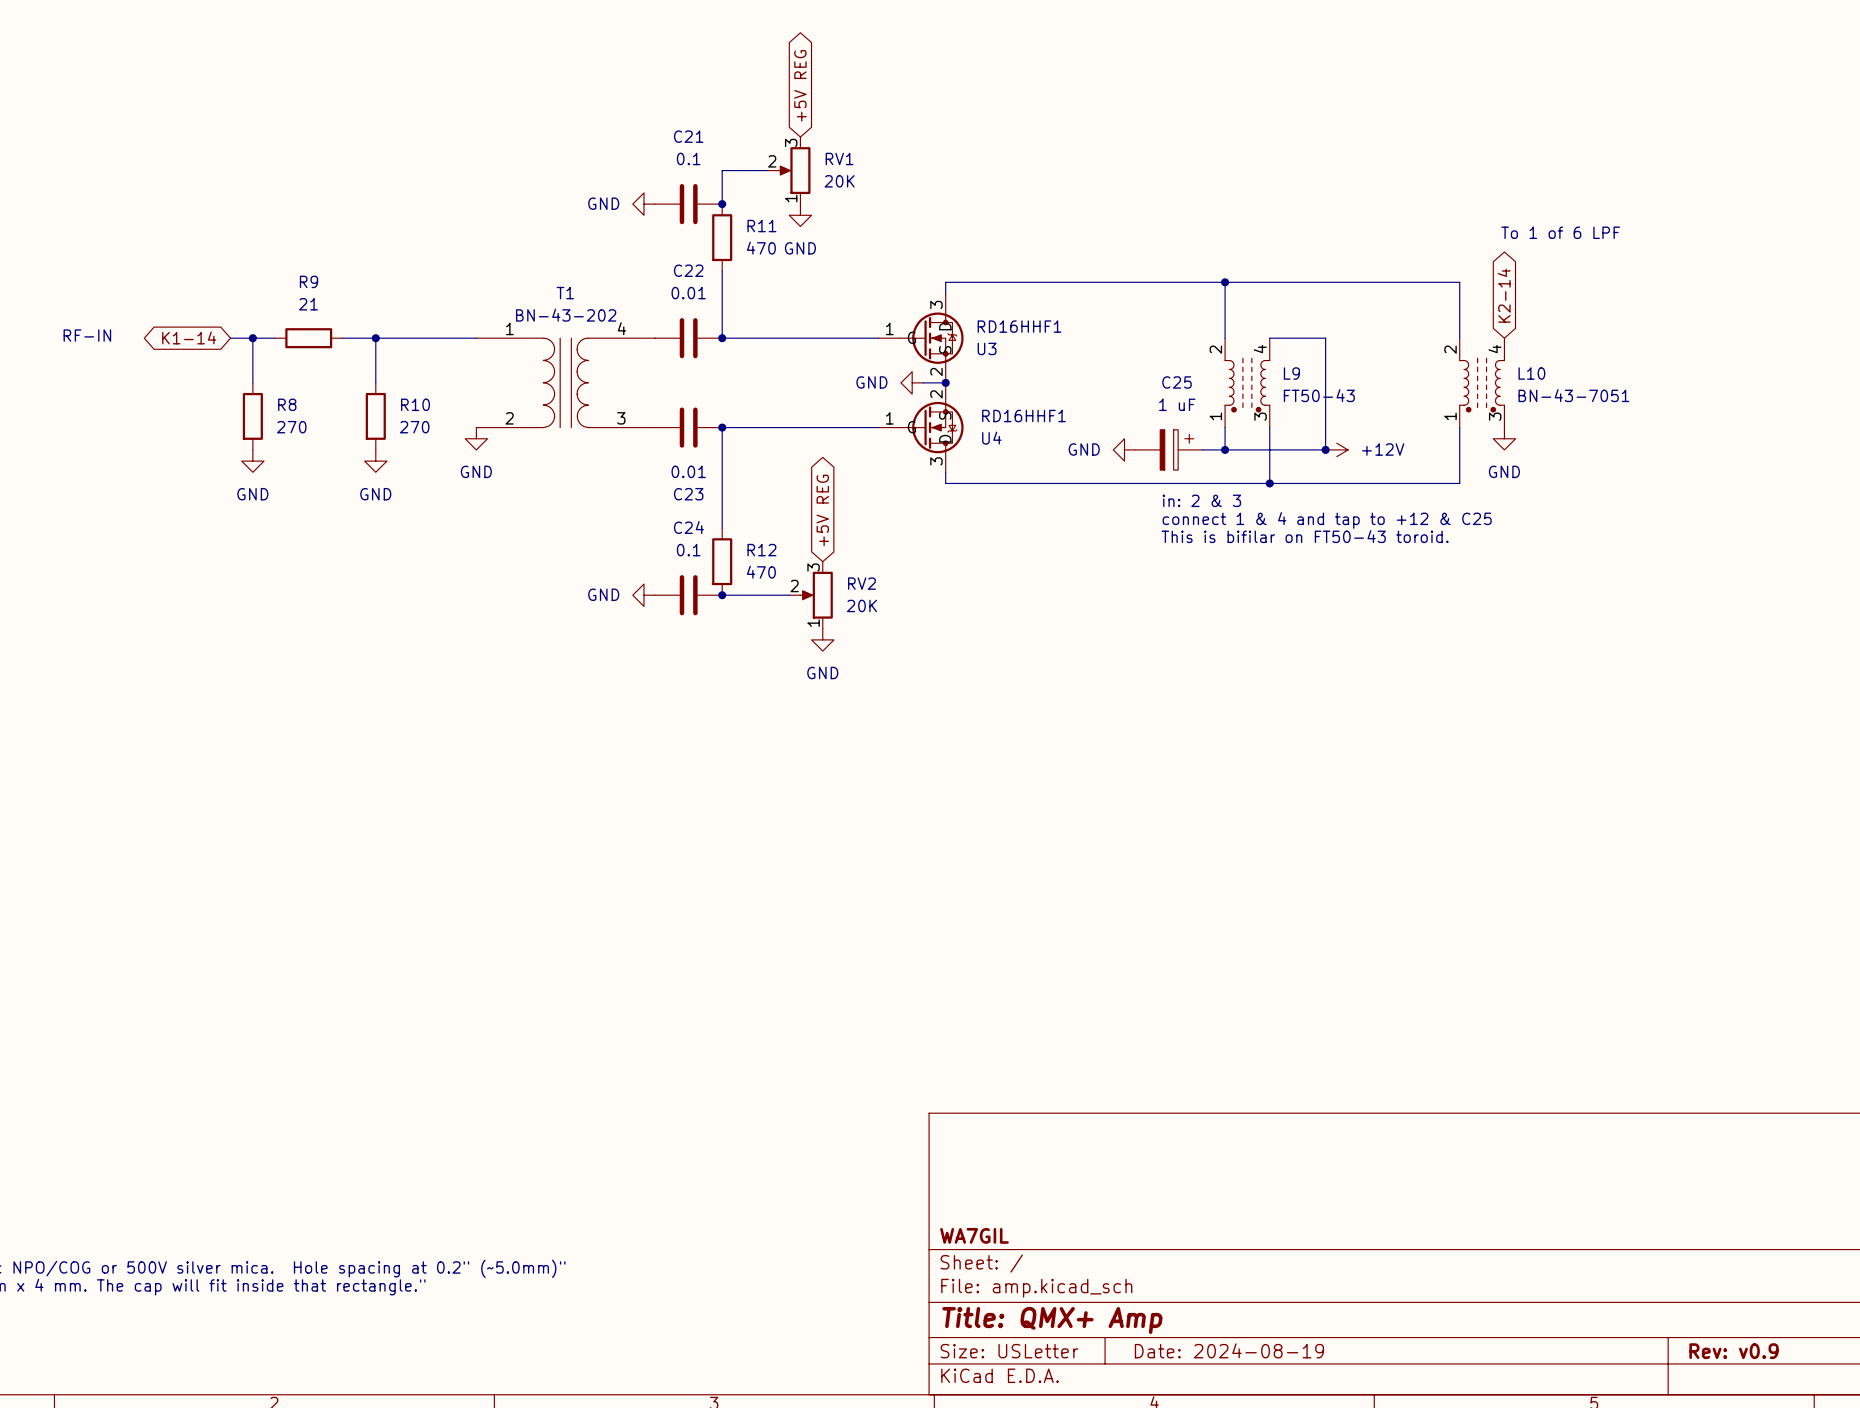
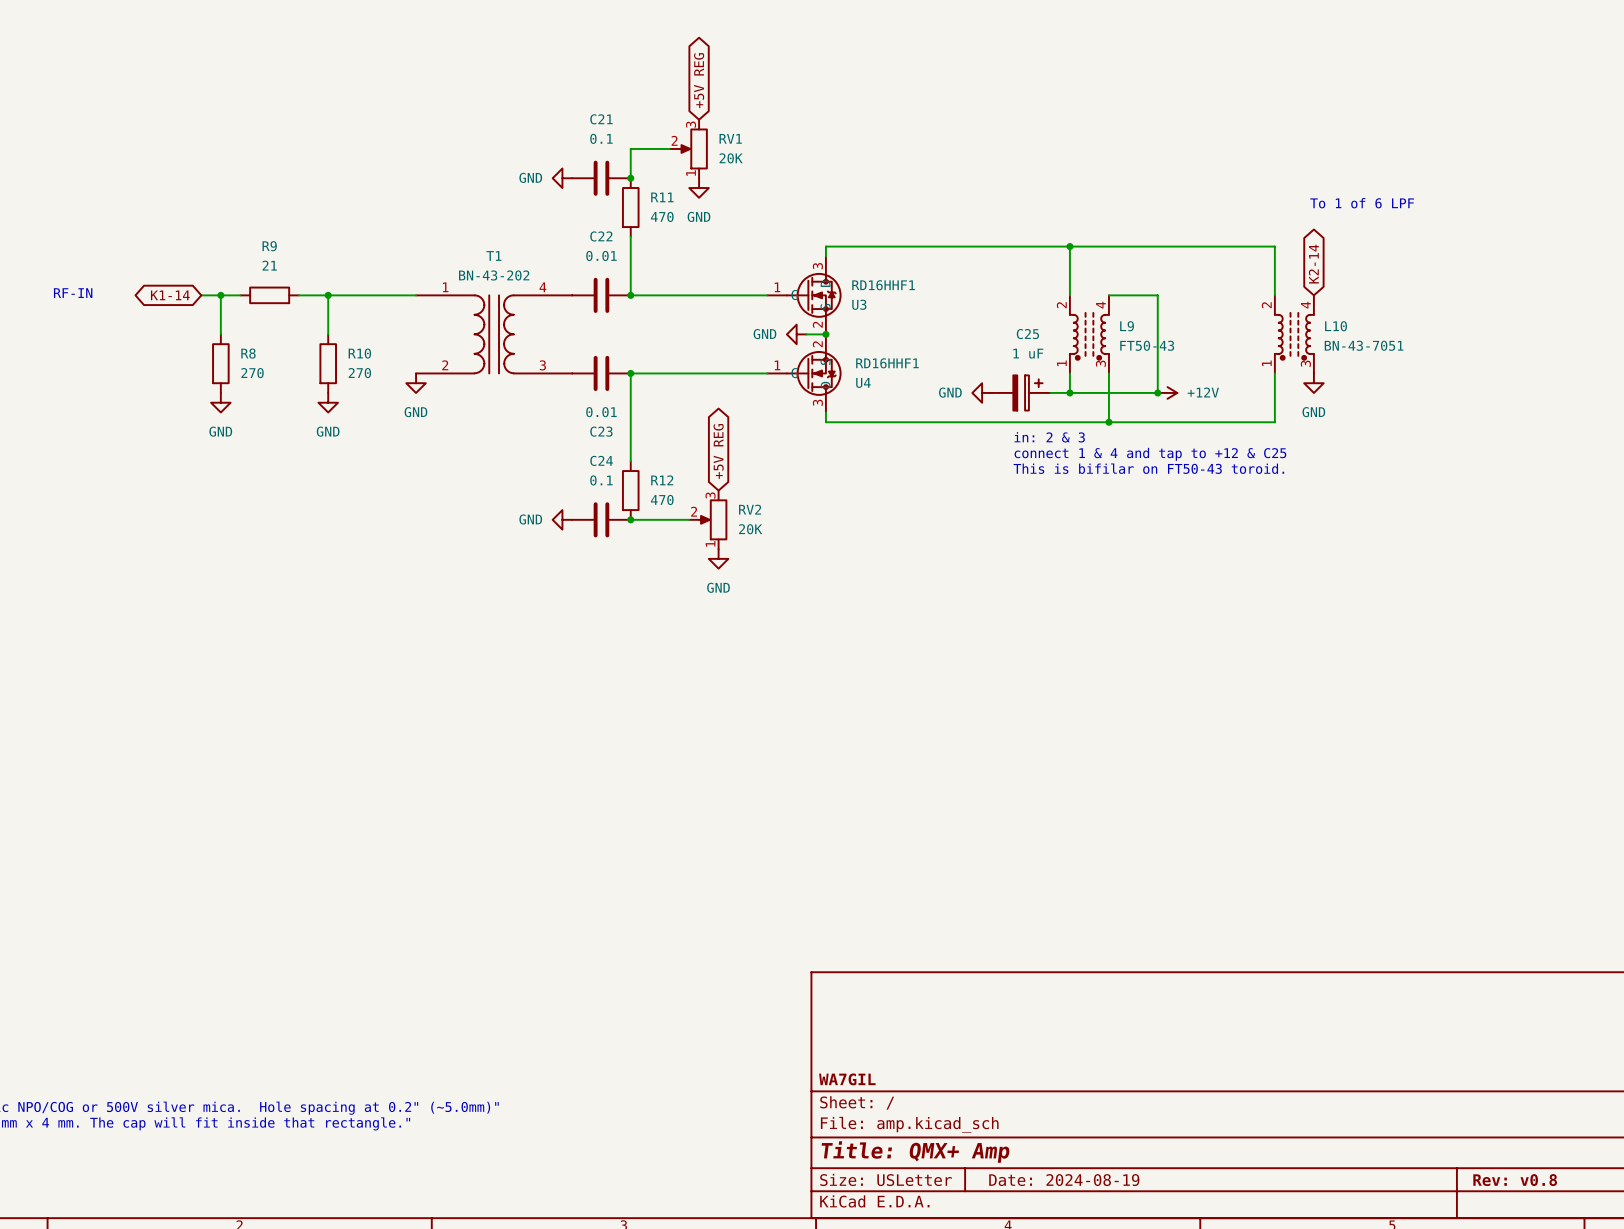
title block: Rev: v0.9 (1734, 1351) -> Rev: v0.8 (1515, 1180)

